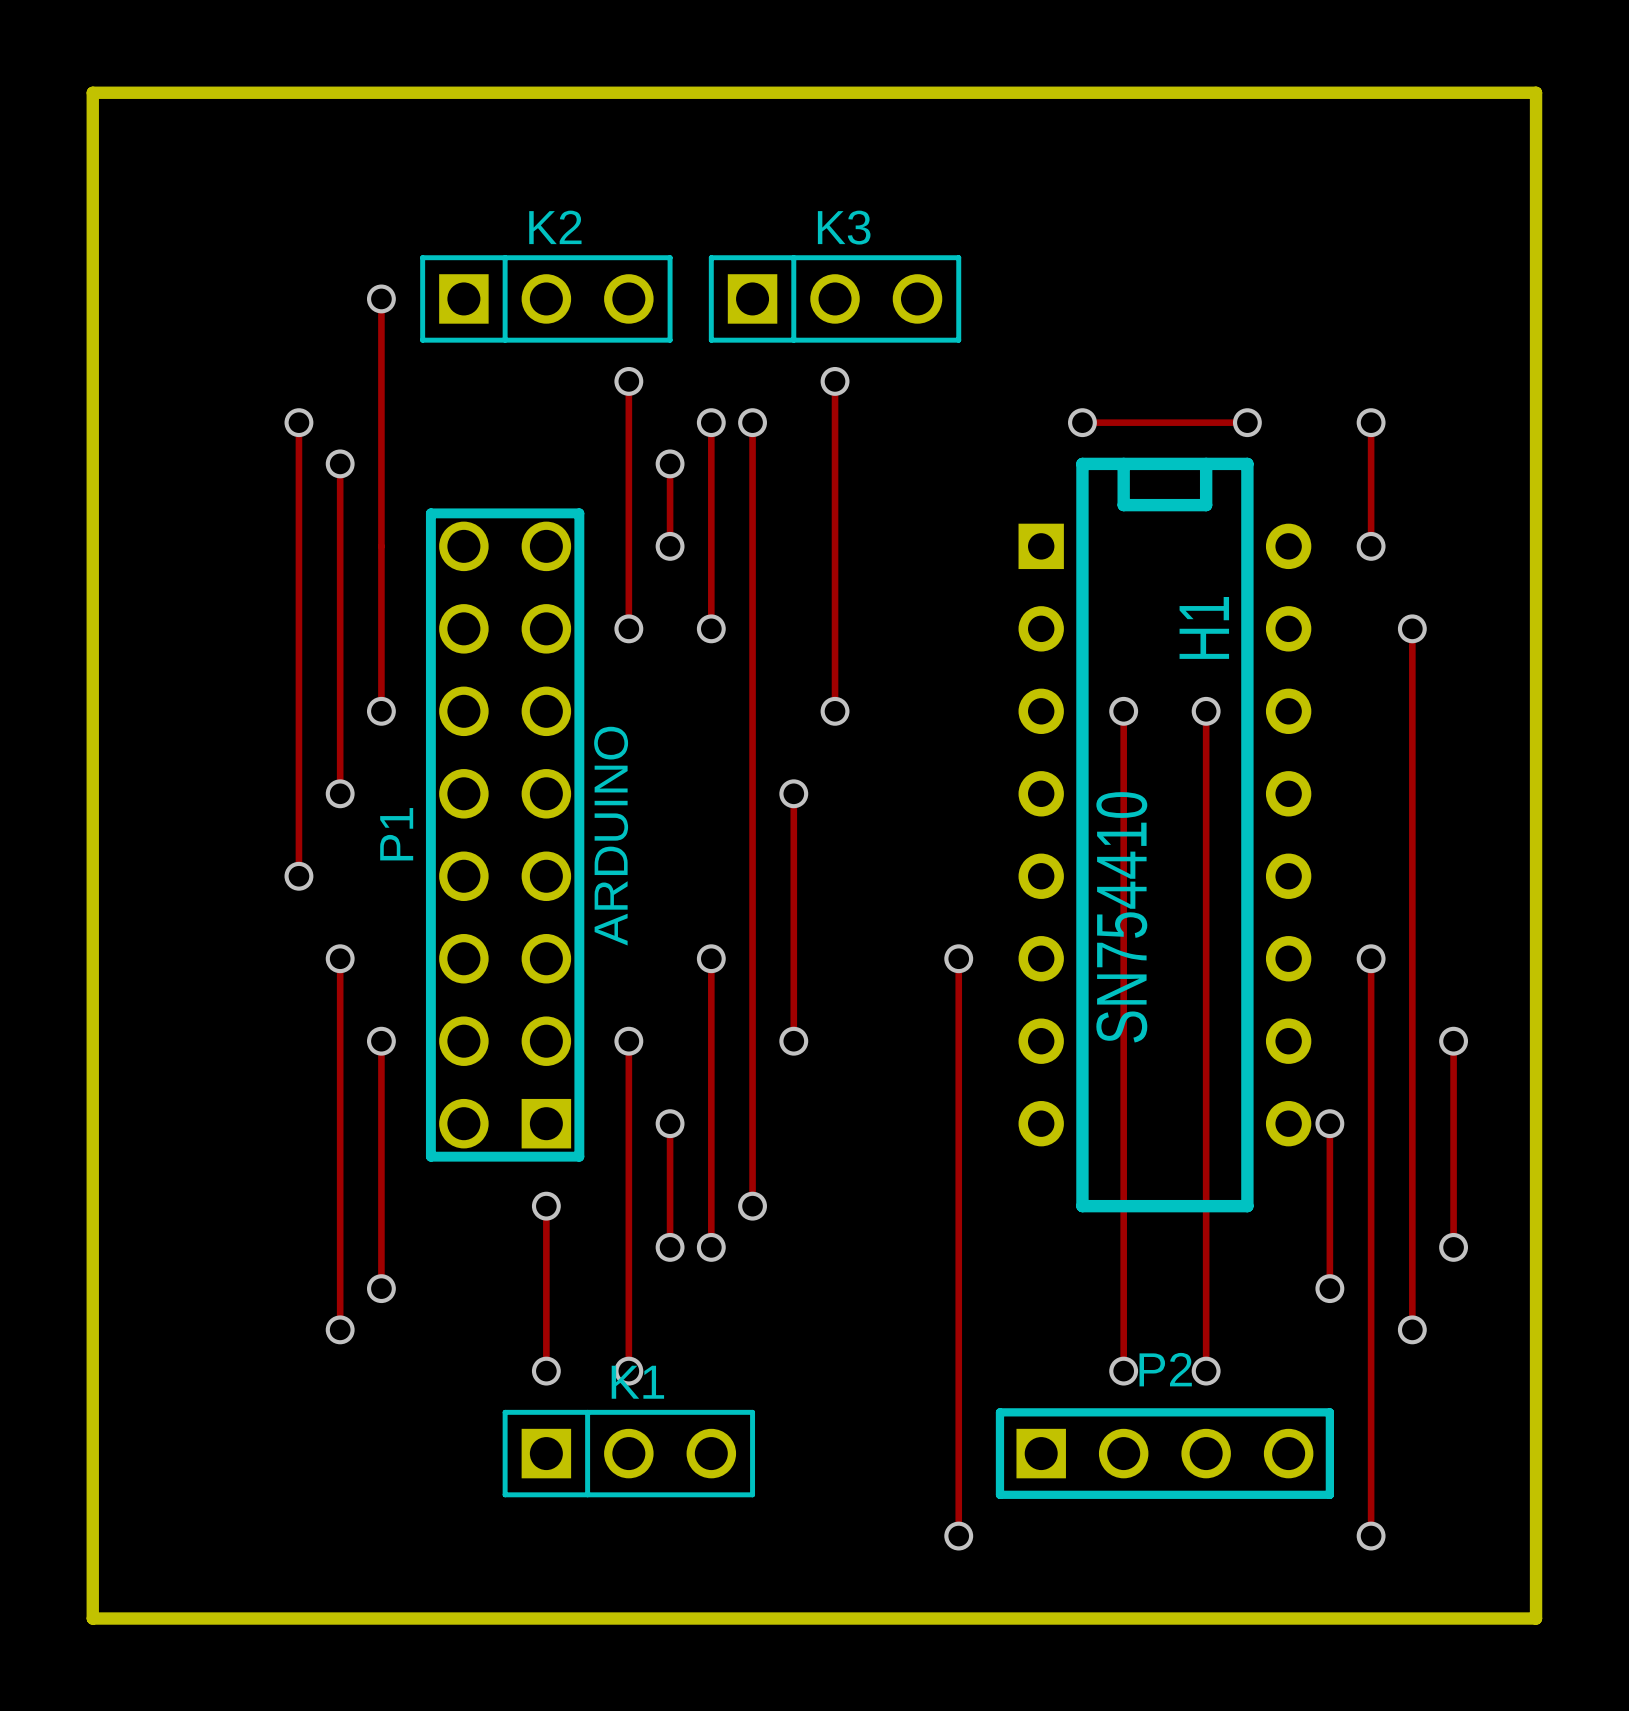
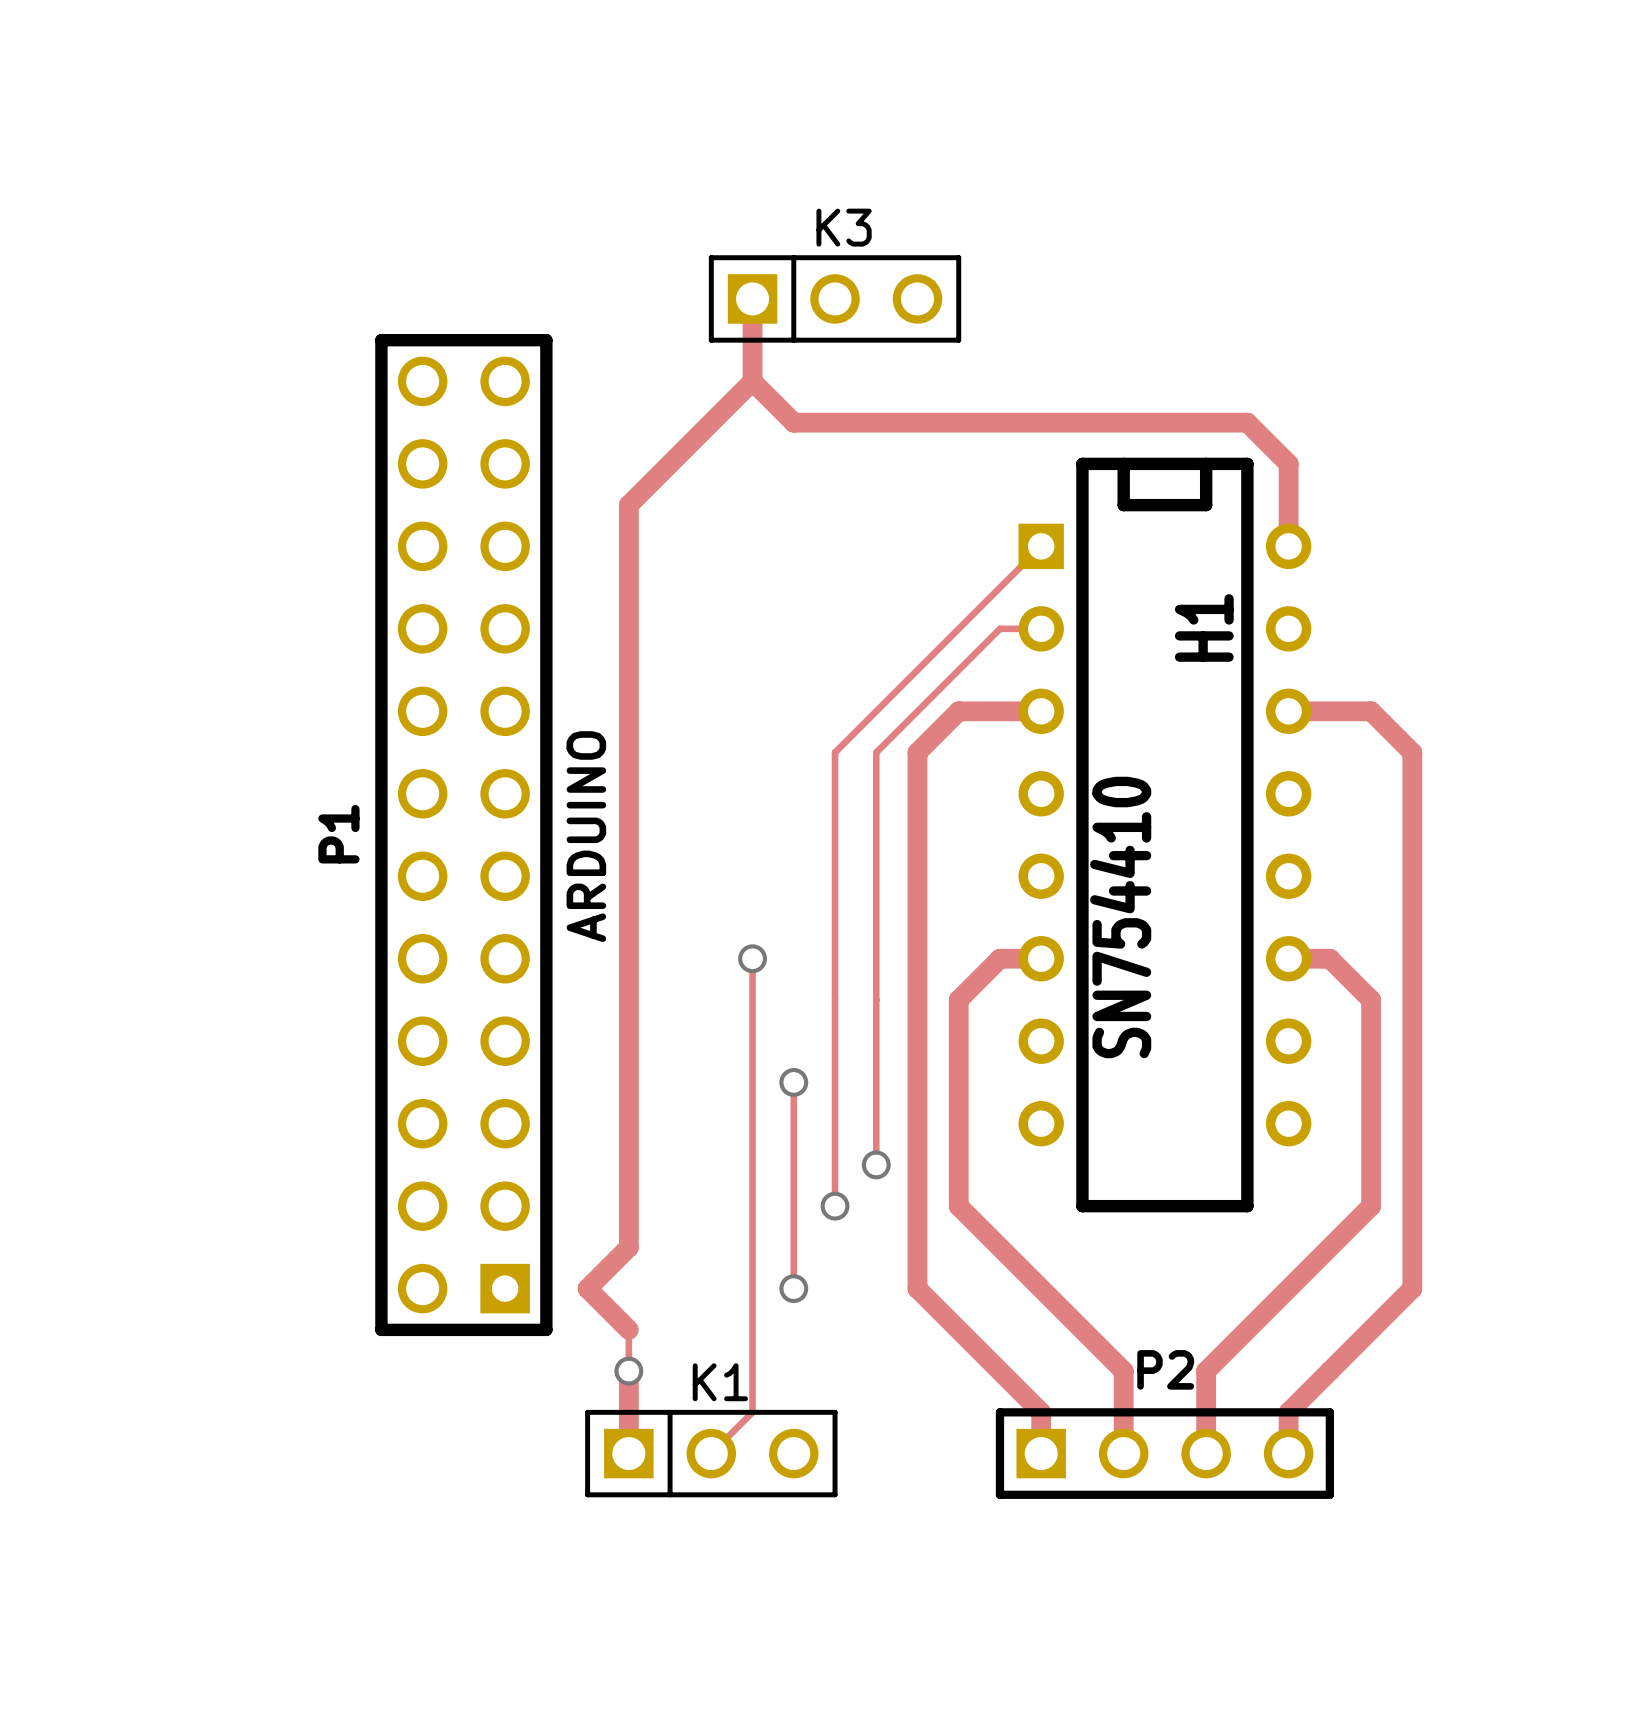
board edge: (92, 92) (92, 1618) (1536, 1618) (1536, 92) (92, 92) -> none
track: (381, 298) (381, 711) -> (628, 628) (628, 1041)
via: (381, 298) -> none
K2: (546, 298) -> none
track: (628, 381) (628, 505) -> (752, 381) (628, 505)
via: (628, 381) -> none
track: none -> (752, 381) (793, 422)
track: (835, 381) (835, 711) -> none
via: (835, 381) -> none
track: (298, 422) (298, 876) -> none
via: (298, 422) -> none
track: (711, 422) (711, 628) -> none
via: (711, 422) -> none
track: (752, 422) (752, 958) -> none
via: (752, 422) -> none
track: none -> (793, 422) (1247, 422)
via: (1082, 422) -> none
track: none -> (1247, 422) (1288, 463)
via: (1247, 422) -> none
track: (1371, 422) (1371, 546) -> none
via: (1371, 422) -> none
track: (340, 463) (340, 793) -> none
via: (340, 463) -> none
track: (670, 463) (670, 546) -> (752, 298) (752, 381)
via: (670, 463) -> none
track: none -> (1288, 463) (1288, 546) (1288, 463)
track width: thin (628, 505) (628, 628) -> thick (628, 505) (628, 628)
P1 footprint: [425, 508, 585, 1162] -> [375, 333, 553, 1337]
via: (670, 546) -> none
track: none -> (1041, 546) (835, 752) (835, 1206)
via: (1371, 546) -> none
via: (628, 628) -> none
via: (711, 628) -> none
track: none -> (1041, 628) (999, 628) (876, 752) (876, 1164)
track: (1412, 628) (1412, 752) -> none
via: (1412, 628) -> none
via: (381, 711) -> none
via: (835, 711) -> none
track: none -> (1041, 711) (958, 711) (917, 752) (917, 1288) (1041, 1412) (1041, 1453)
track: (1123, 711) (1123, 1371) -> none
via: (1123, 711) -> none
track: (1206, 711) (1206, 1371) -> none
via: (1206, 711) -> none
track: none -> (1288, 711) (1371, 711)
track: none -> (1371, 711) (1412, 752) (1371, 711)
track width: thin (1412, 752) (1412, 1288) -> thick (1412, 752) (1412, 1288)
via: (340, 793) -> none
track: (793, 793) (793, 1041) -> none
via: (793, 793) -> none
via: (298, 876) -> none
track: (340, 958) (340, 1329) -> none
via: (340, 958) -> none
track: (711, 958) (711, 1247) -> none
via position: (711, 958) -> (752, 958)
track: (958, 958) (958, 999) -> (1041, 958) (999, 958) (958, 999)
via: (958, 958) -> none
track: (1371, 958) (1371, 999) -> (1288, 958) (1329, 958) (1371, 999)
via: (1371, 958) -> none
track width: thin (958, 999) (958, 1206) -> thick (958, 999) (958, 1206)
track width: thin (1371, 999) (1371, 1206) -> thick (1371, 999) (1371, 1206)
track: (381, 1041) (381, 1288) -> none
via: (381, 1041) -> none
track width: thin (628, 1041) (628, 1247) -> thick (628, 1041) (628, 1247)
via: (628, 1041) -> none
via position: (793, 1041) -> (793, 1082)
track: (1453, 1041) (1453, 1247) -> (793, 1082) (793, 1288)
via: (1453, 1041) -> none
track: (670, 1123) (670, 1247) -> none
via: (670, 1123) -> none
track: (1329, 1123) (1329, 1288) -> none
via: (1329, 1123) -> none
via: none -> (876, 1164)
track: (546, 1206) (546, 1371) -> none
via: (546, 1206) -> none
track: none -> (752, 1206) (752, 1412) (711, 1453)
via: (752, 1206) -> none
via: none -> (835, 1206)
track: (958, 1206) (958, 1536) -> (958, 1206) (1123, 1371) (1123, 1453)
track: (1371, 1206) (1371, 1536) -> (1371, 1206) (1206, 1371) (1206, 1453)
track: (628, 1247) (628, 1329) -> (628, 1247) (587, 1288) (628, 1329)
via: (670, 1247) -> none
via: (711, 1247) -> none
via: (1453, 1247) -> none
via: (381, 1288) -> none
via: none -> (793, 1288)
via: (1329, 1288) -> none
track: (1412, 1288) (1412, 1329) -> (1412, 1288) (1288, 1412) (1288, 1453)
via: (340, 1329) -> none
via: (1412, 1329) -> none
via: (546, 1371) -> none
track: none -> (628, 1371) (628, 1453)
via: (1123, 1371) -> none
via: (1206, 1371) -> none
K1 position: (628, 1453) -> (711, 1453)
via: (958, 1536) -> none
via: (1371, 1536) -> none

